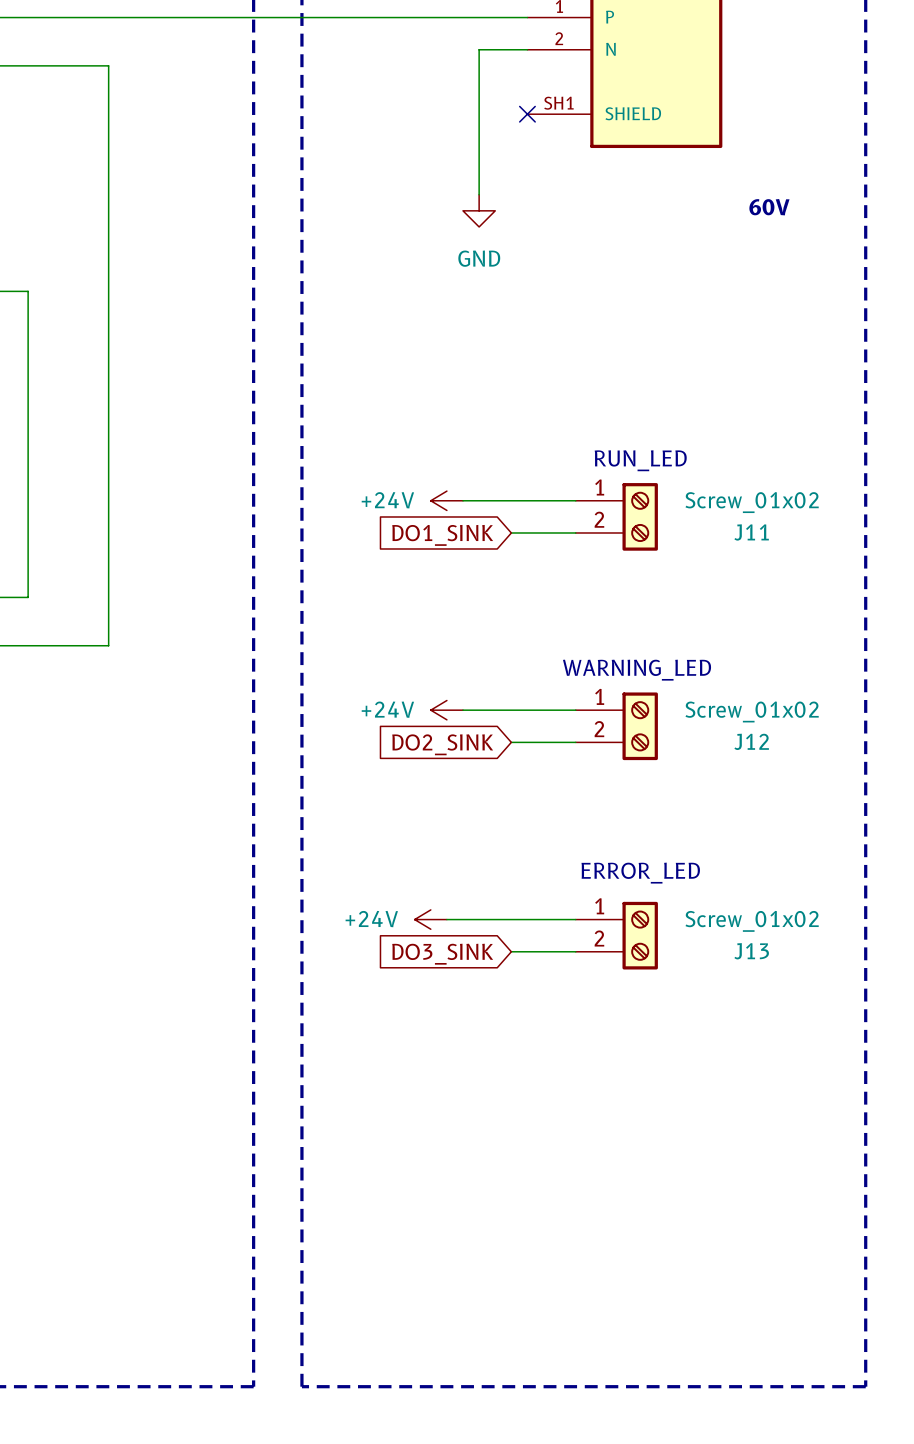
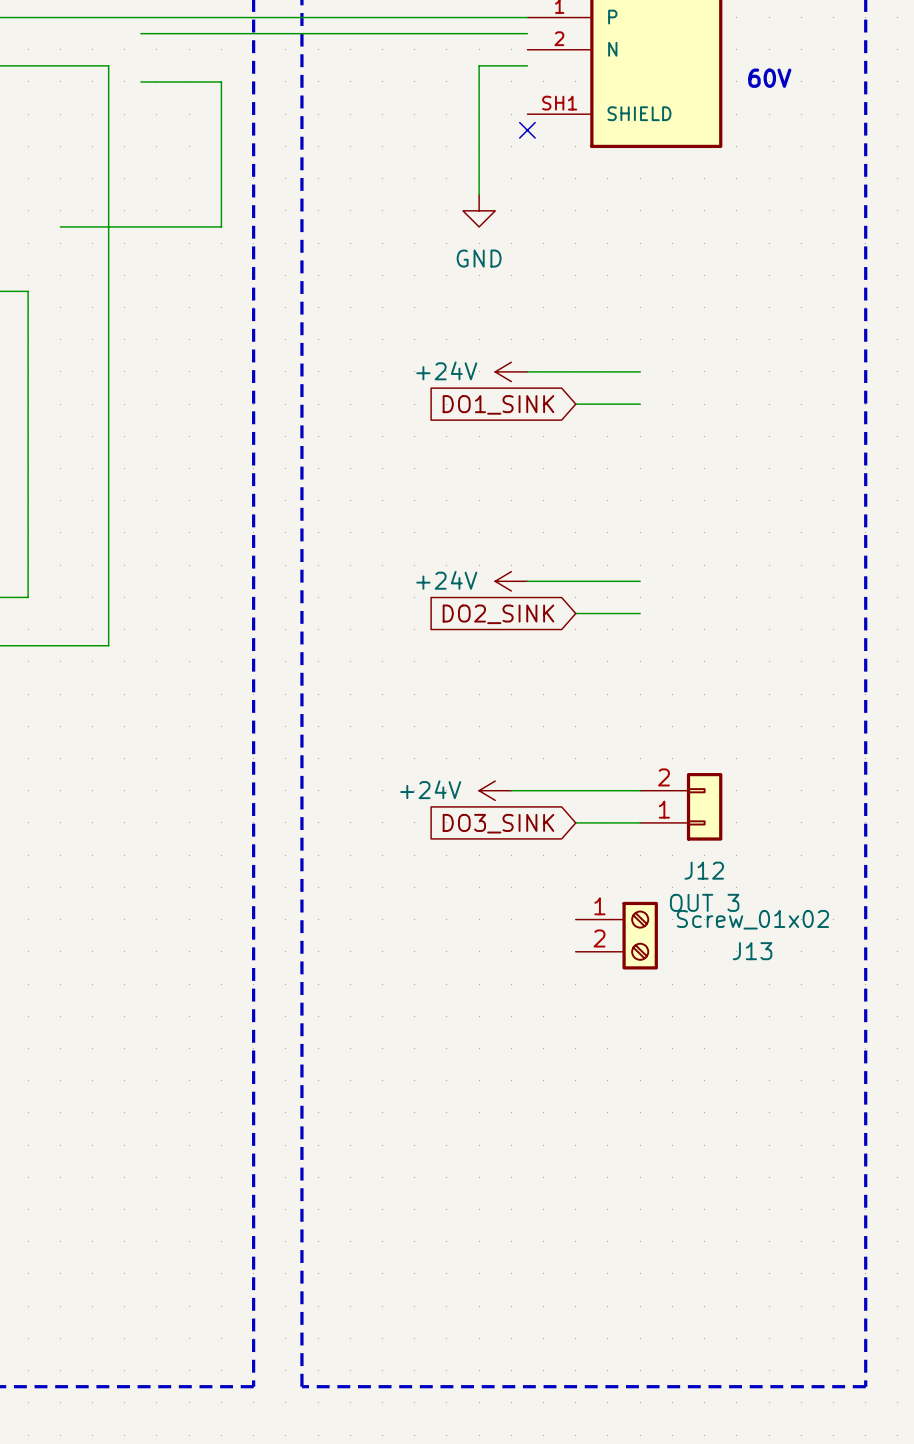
wire: none -> (140, 33) (527, 33)
wire: (527, 49) (479, 49) (479, 65) -> (527, 65) (479, 65)
wire: none -> (140, 81) (221, 81) (221, 226) (60, 226)
no-connect mark position: (527, 114) -> (527, 130)
text position: 60V (769, 207) -> 60V (769, 78)
power symbol: none -> +24V (511, 371)
text: RUN_LED (640, 460) -> none
power symbol: +24V (446, 500) -> none
wire: (463, 500) (575, 500) -> (527, 371) (640, 371)
J11: Screw_01x02 (616, 516) -> none
wire: (511, 532) (575, 532) -> (575, 404) (640, 404)
global label position: DO1_SINK (442, 535) -> DO1_SINK (498, 404)
power symbol: none -> +24V (511, 581)
text: WARNING_LED (637, 670) -> none
J12 symbol: [575, 692, 658, 761] -> [640, 772, 723, 841]
power symbol: +24V (446, 710) -> none
wire: (463, 710) (575, 710) -> (527, 581) (640, 581)
J12 value: Screw_01x02 (752, 711) -> OUT 3 (704, 902)
J12 name position: J12 (751, 741) -> J12 (704, 870)
wire: (511, 742) (575, 742) -> (575, 613) (640, 613)
global label position: DO2_SINK (442, 744) -> DO2_SINK (498, 614)
power symbol: none -> +24V (495, 790)
text: ERROR_LED (640, 873) -> none
power symbol: +24V (430, 919) -> none
wire: (446, 919) (575, 919) -> (511, 790) (640, 790)
wire: (511, 951) (575, 951) -> (575, 822) (640, 822)
global label position: DO3_SINK (442, 954) -> DO3_SINK (498, 823)

